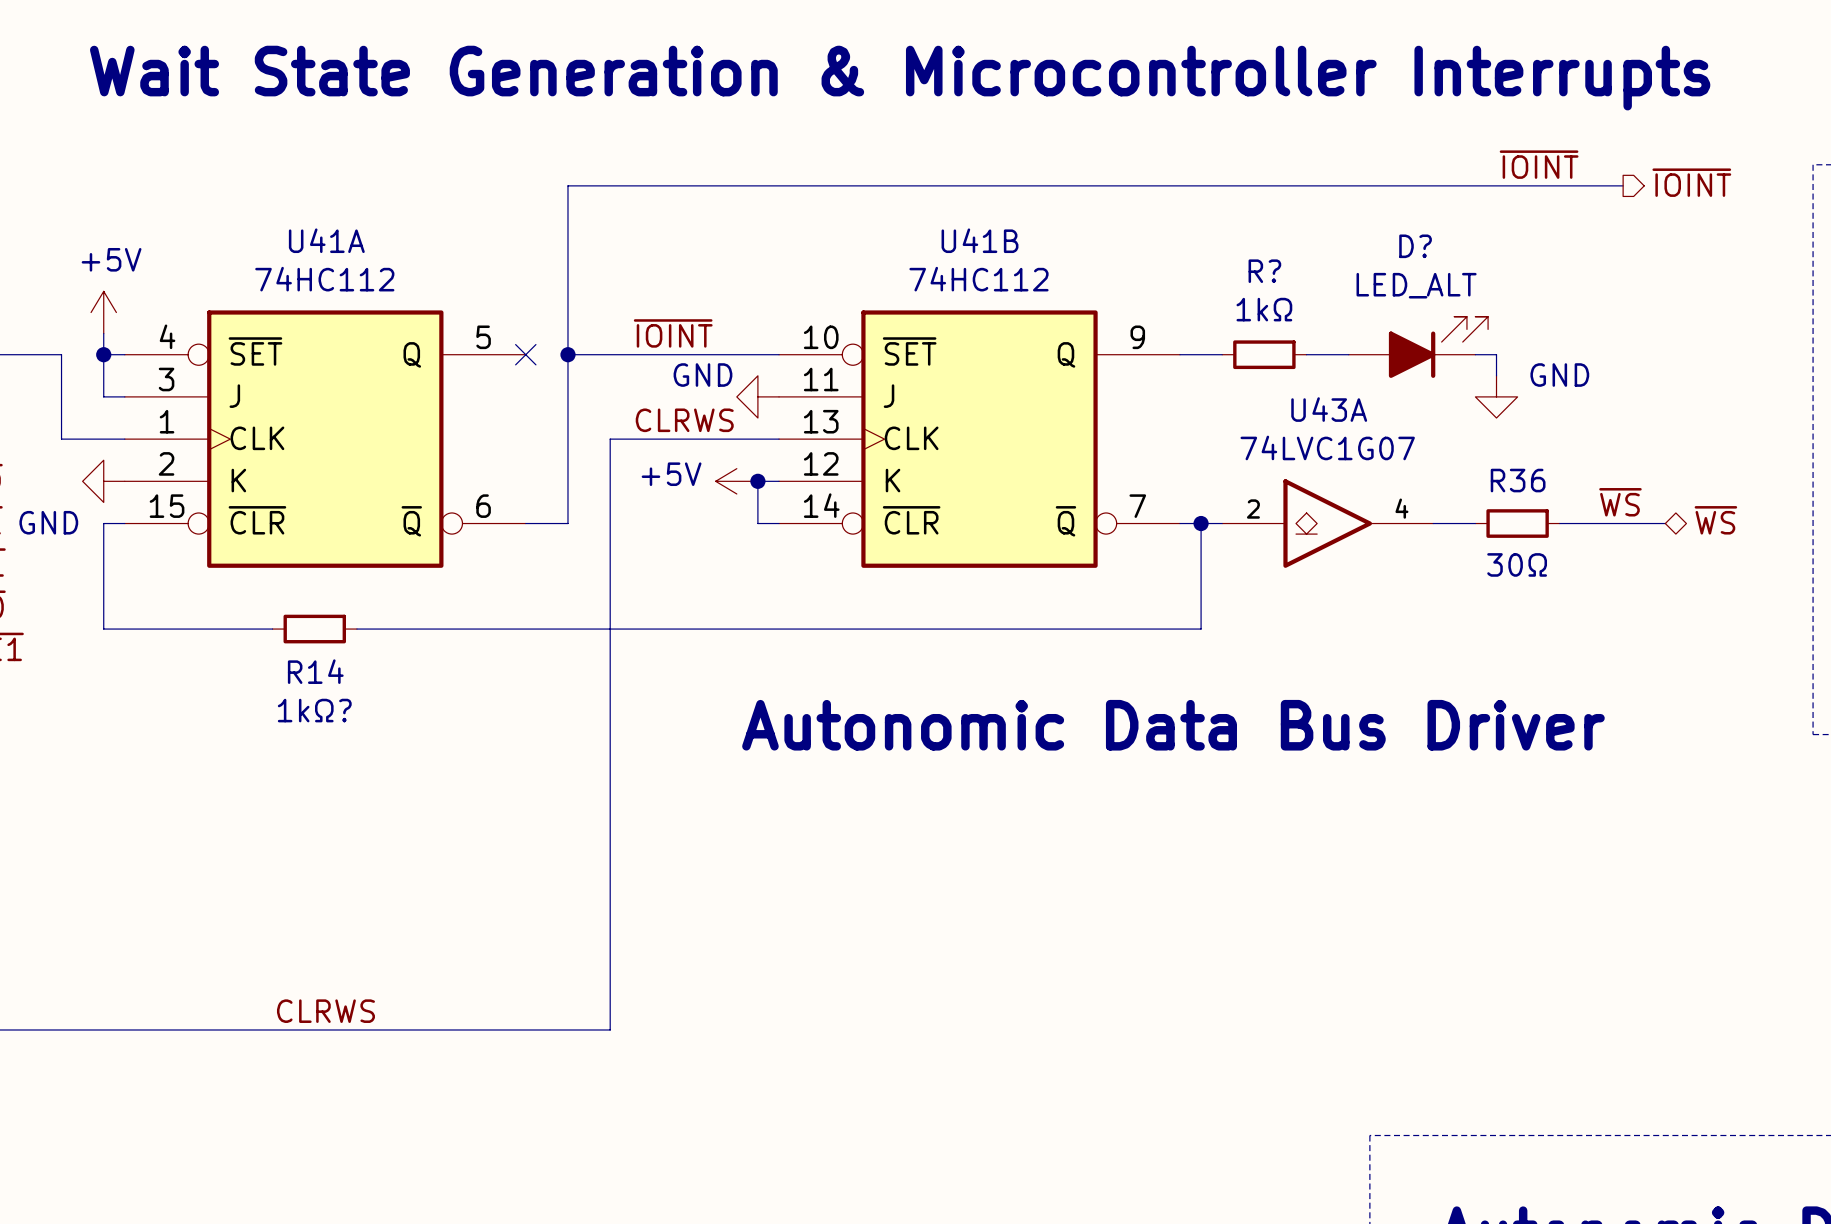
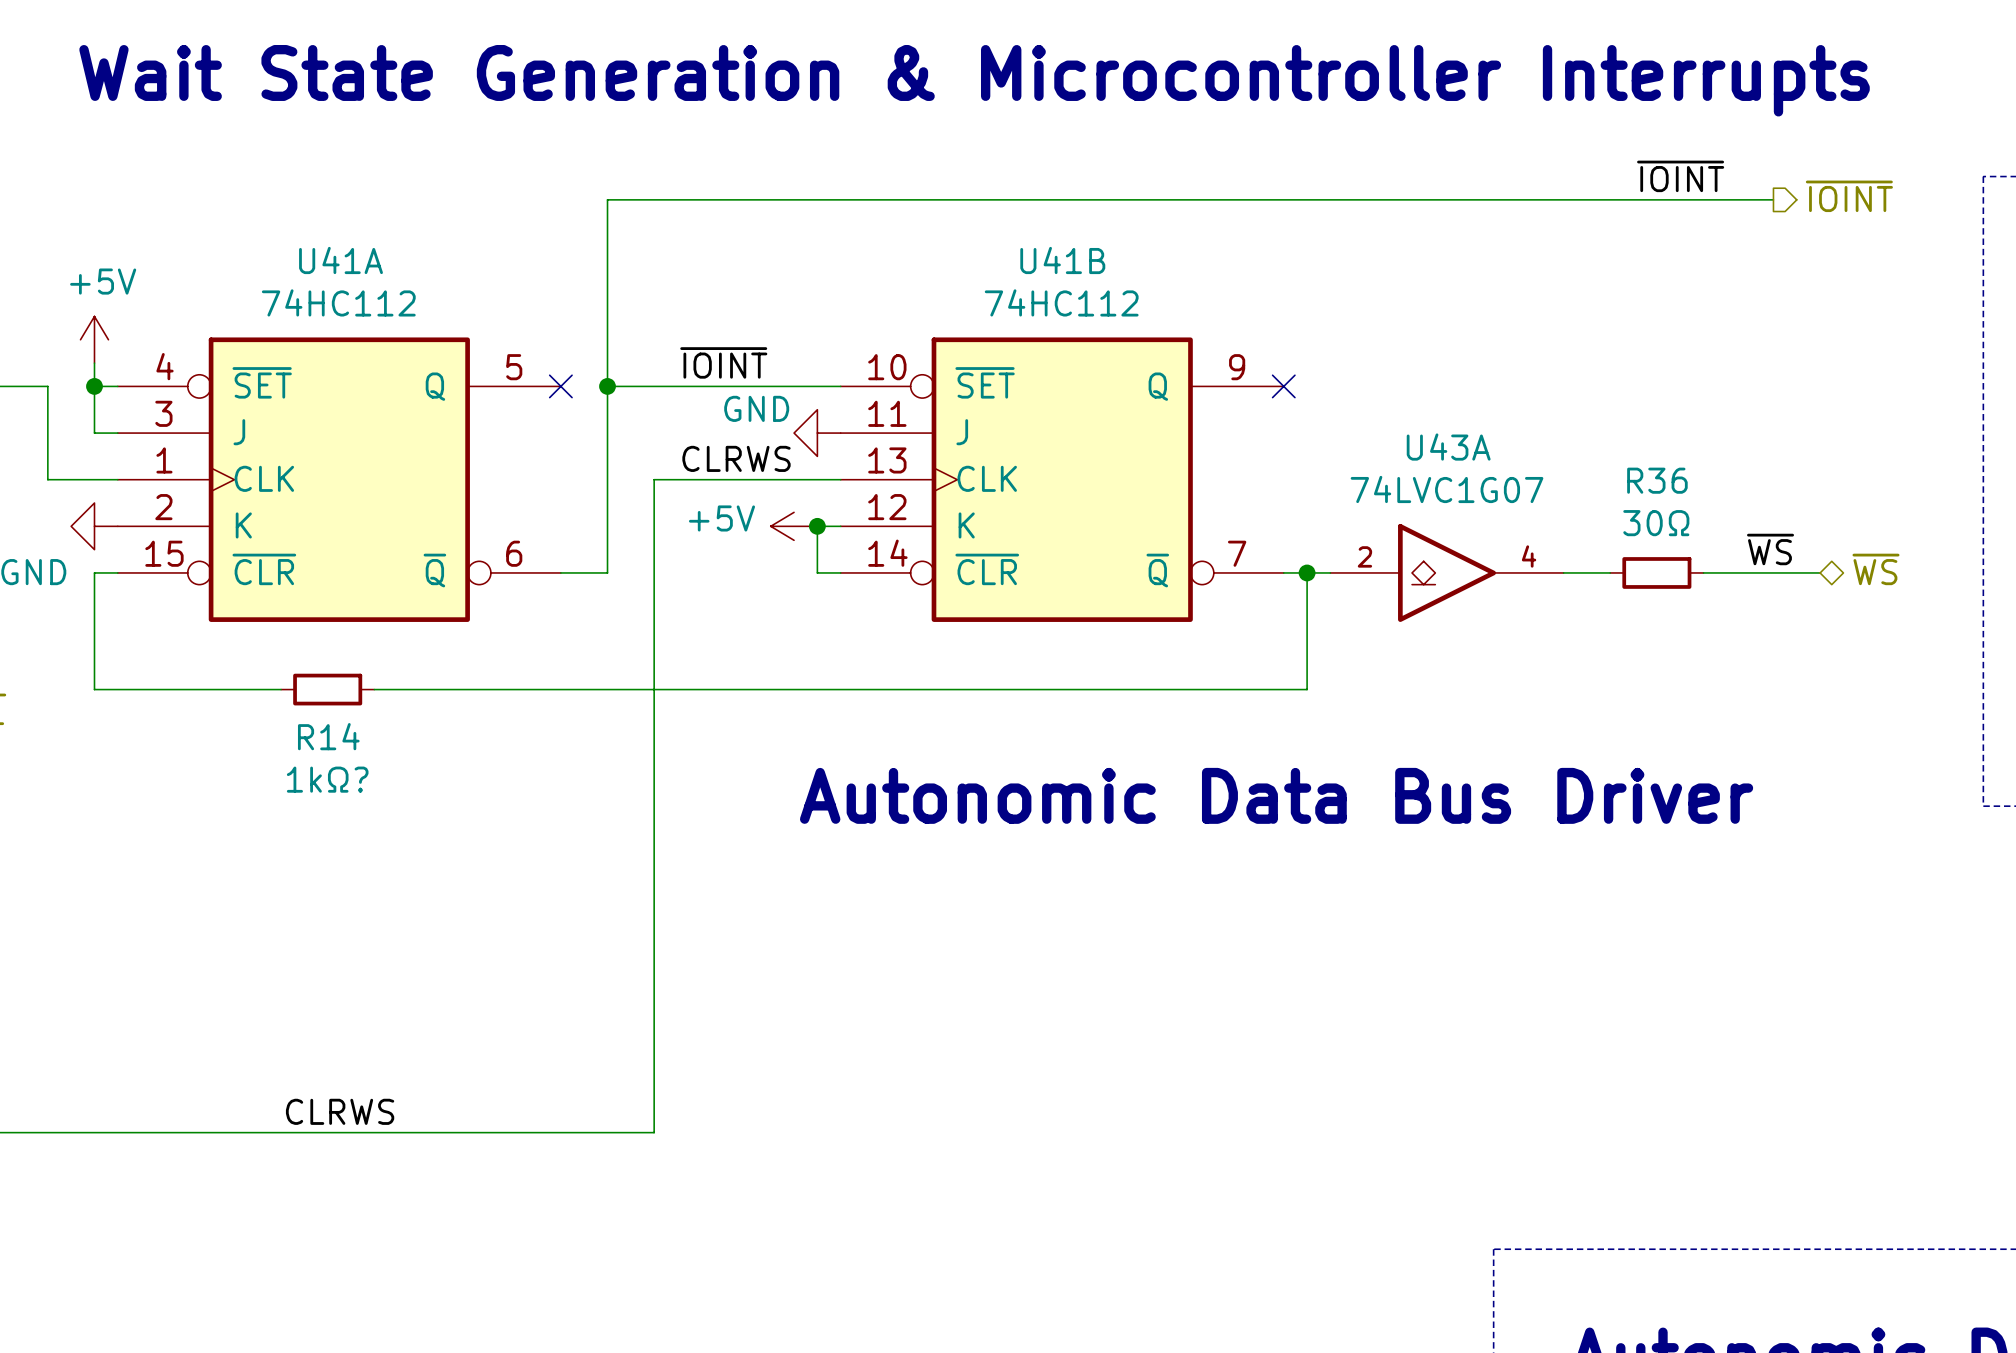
D?: LED_ALT (1418, 347) -> none
wire: (1179, 354) (1222, 354) -> none
no-connect mark: none -> (1283, 386)
R?: 1kΩ (1264, 354) -> none
wire: (1306, 354) (1348, 354) -> none
wire: (1475, 354) (1496, 354) (1496, 375) -> none
power symbol: GND (1496, 396) -> none
R36 name position: R36 (1518, 480) -> R36 (1657, 480)
R36 value position: 30Ω (1517, 564) -> 30Ω (1656, 523)

